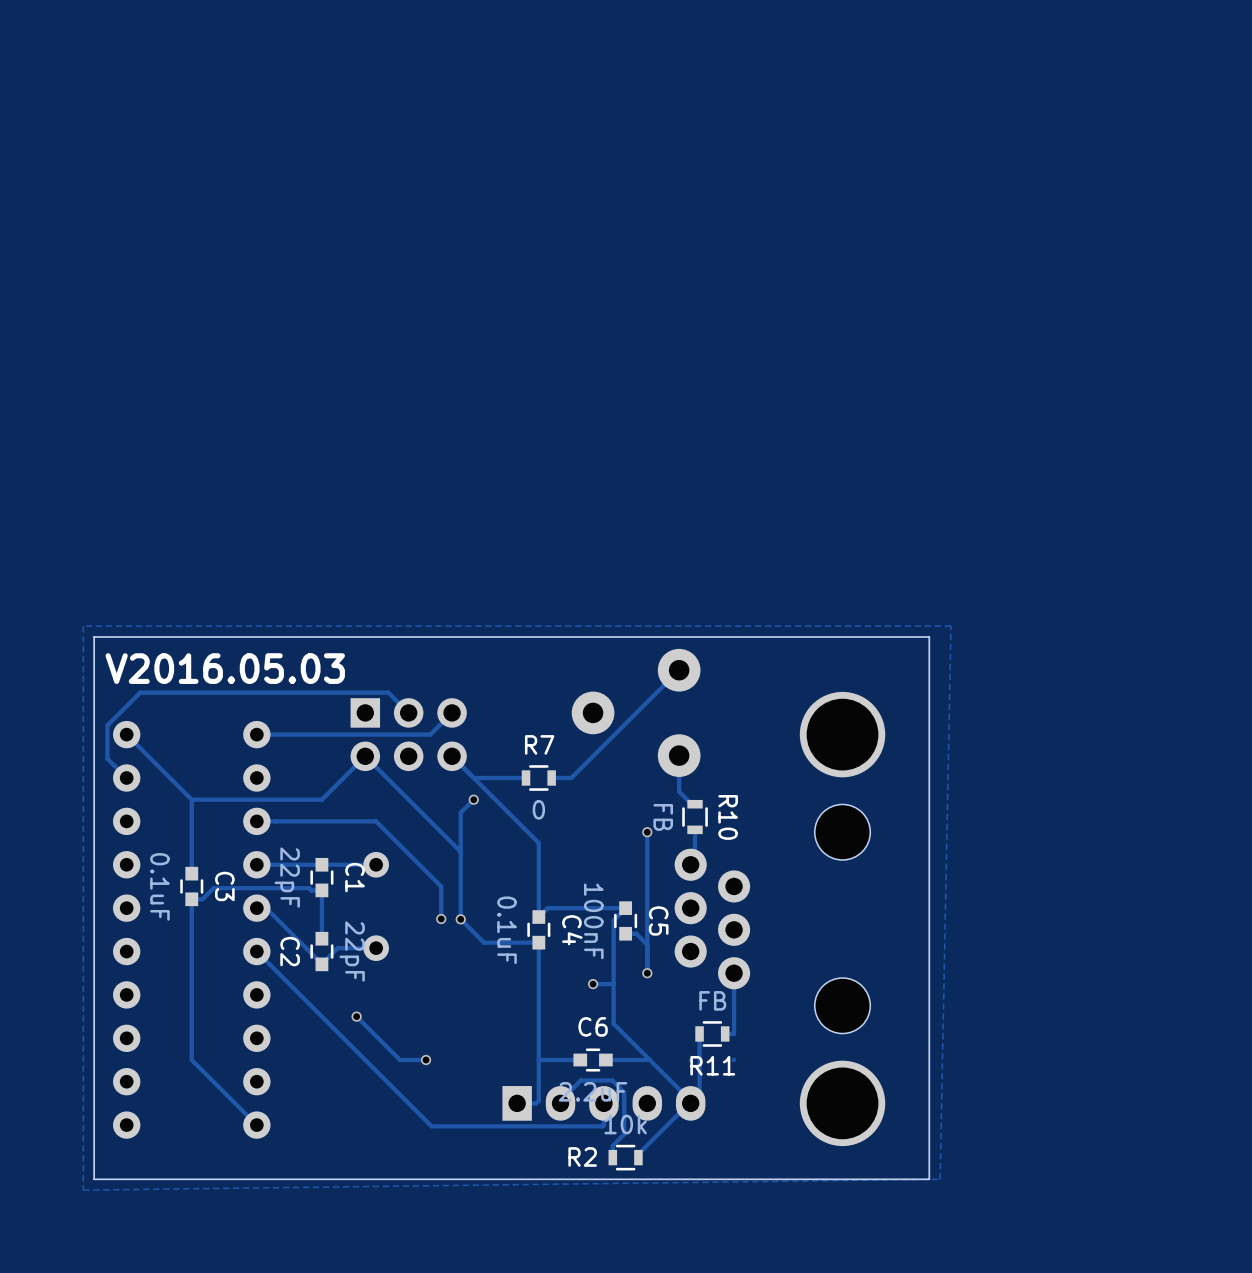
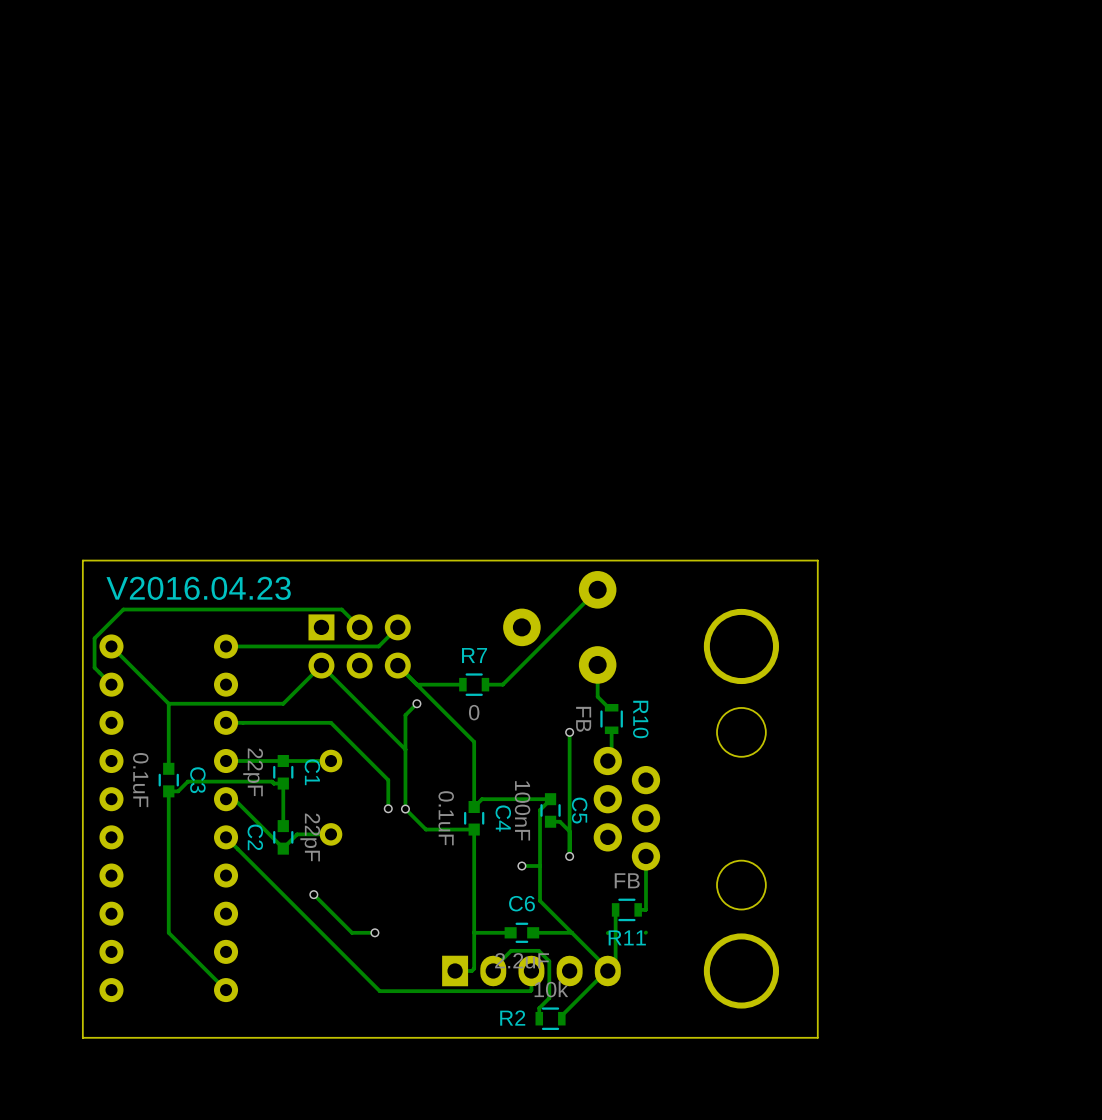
zone outline: (950, 626) (83, 626) (83, 1190) (940, 1179) (950, 626) -> none
text: V2016.05.03 (225, 668) -> V2016.04.23 (198, 588)

